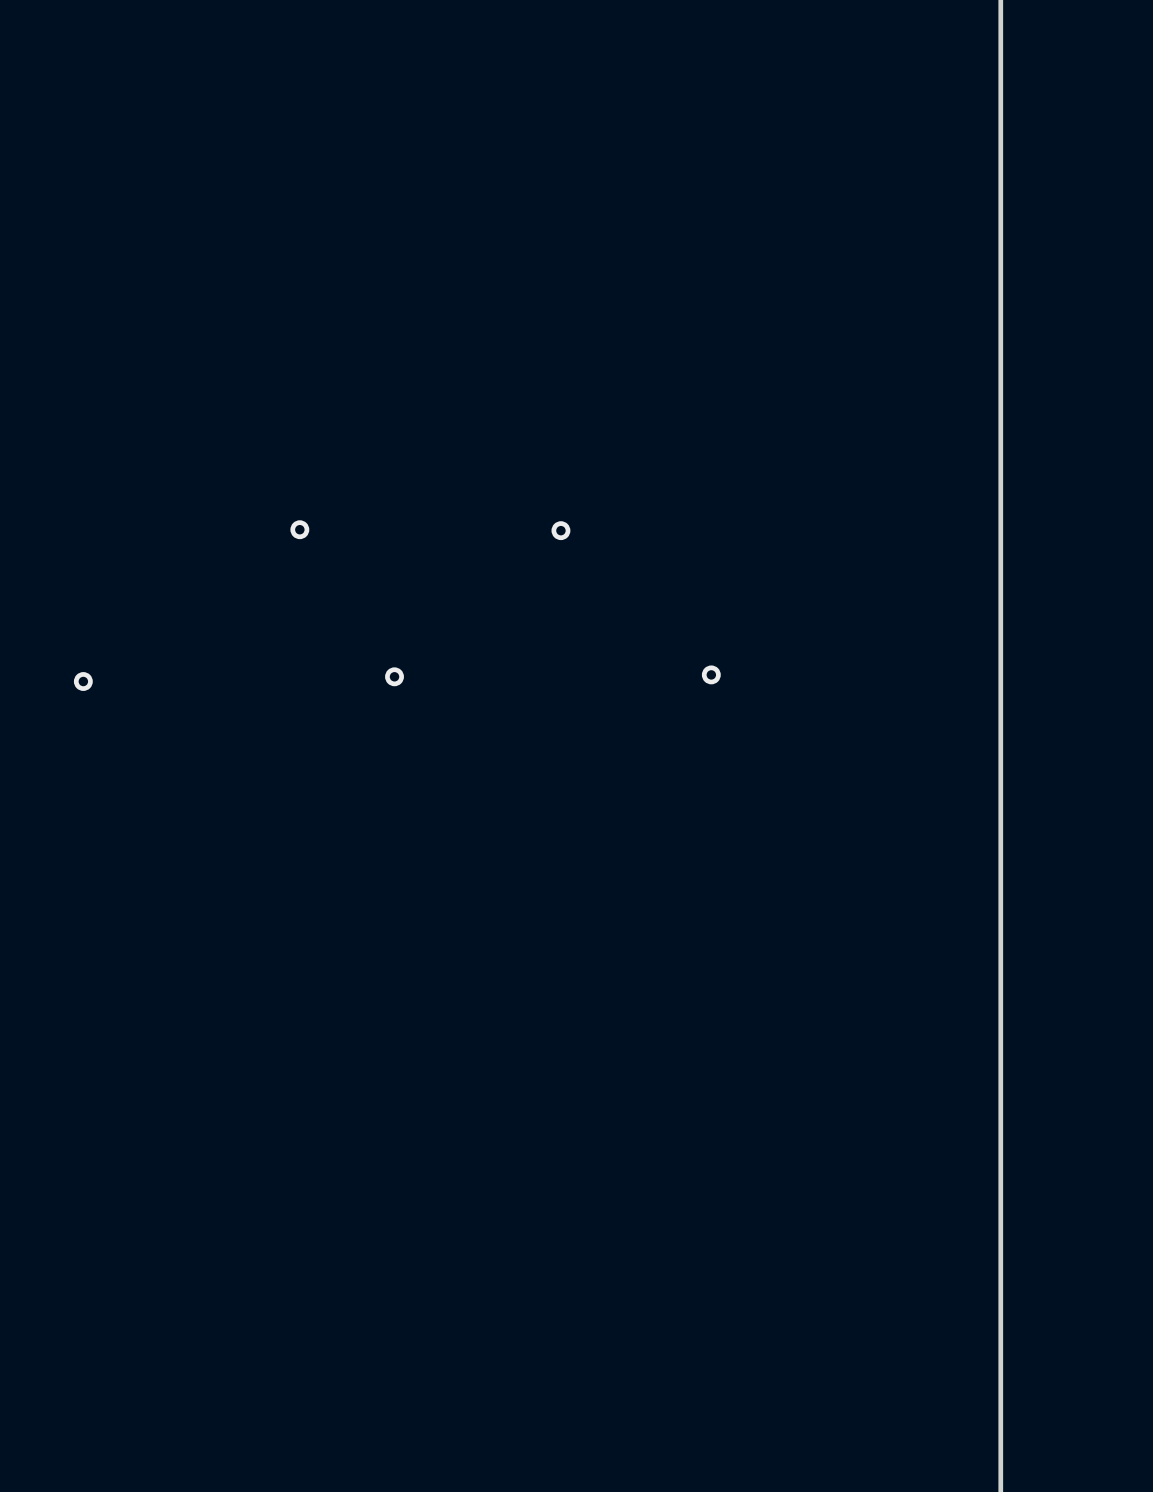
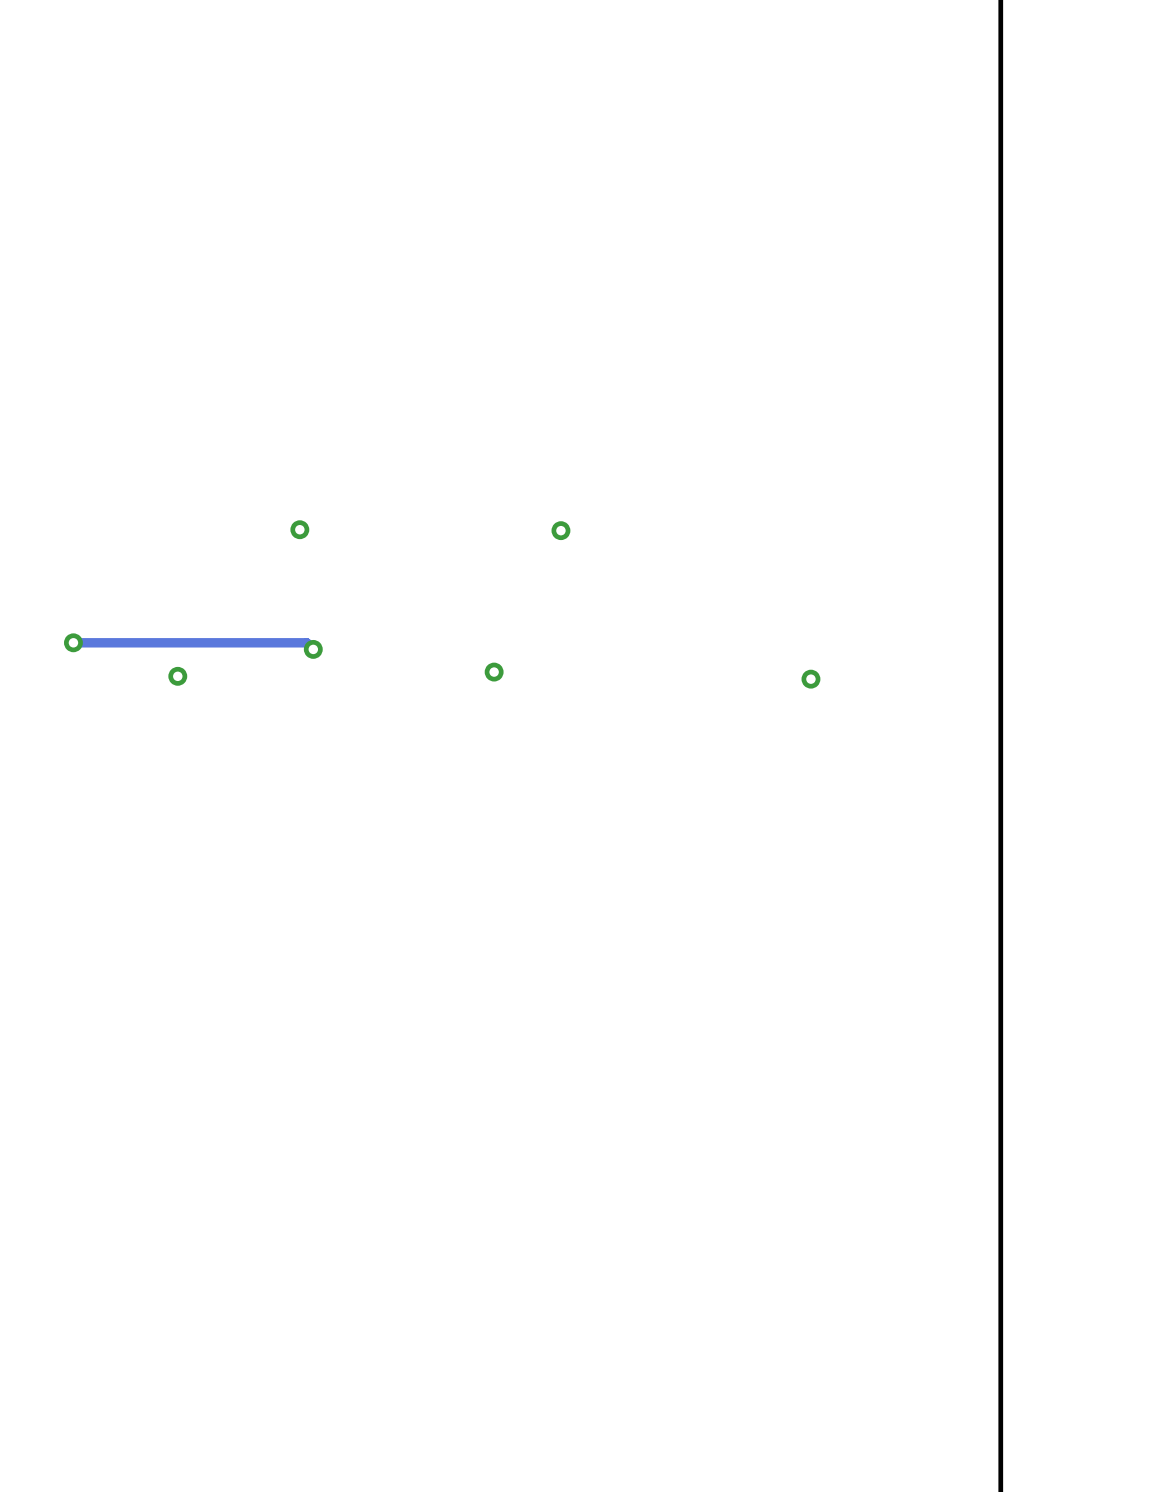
track: none -> (73, 642) (306, 642) (313, 649)
via: none -> (313, 649)
via: none -> (494, 672)
via position: (711, 674) -> (810, 679)
via: none -> (177, 676)
via: (394, 676) -> none
via position: (83, 681) -> (73, 642)

